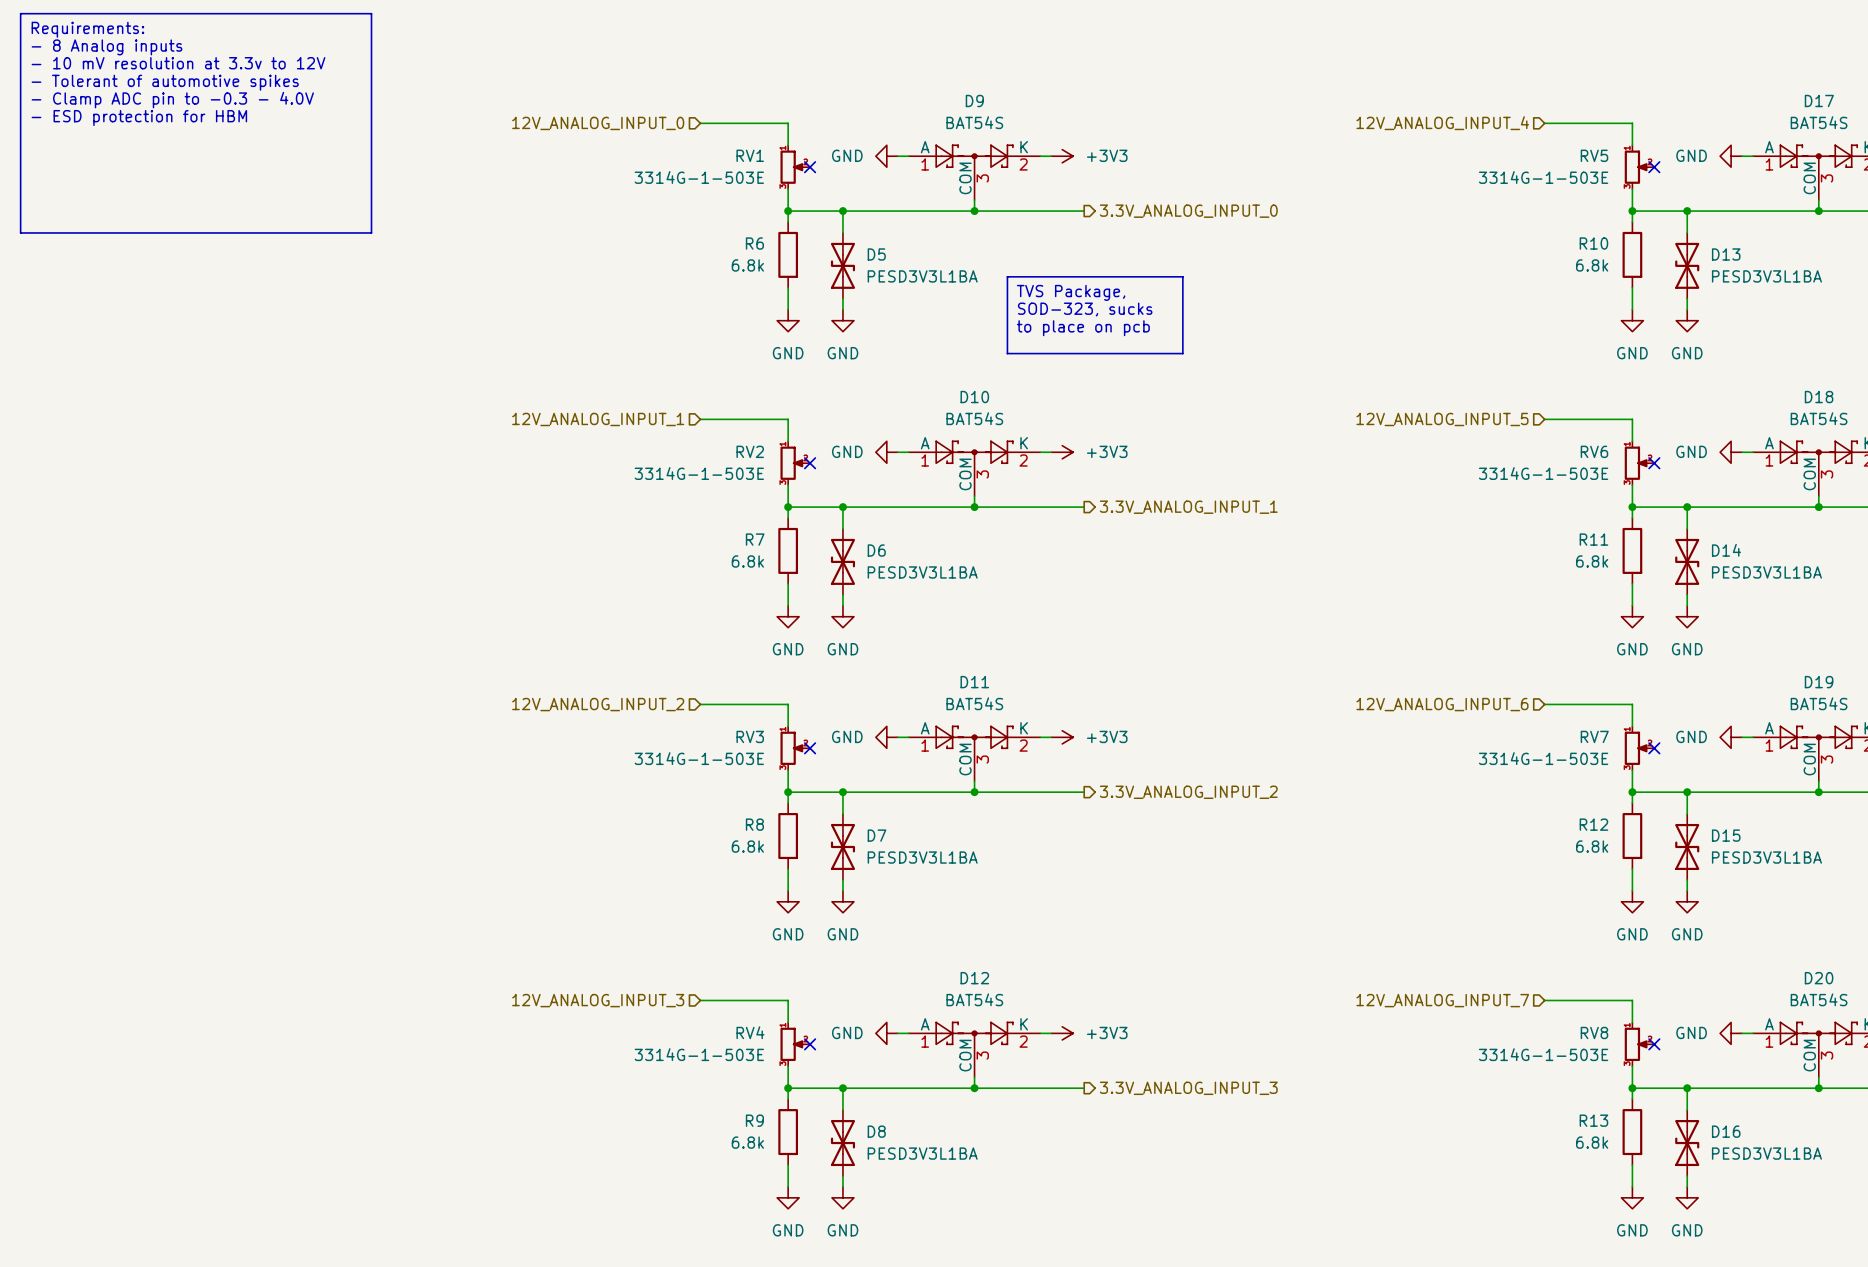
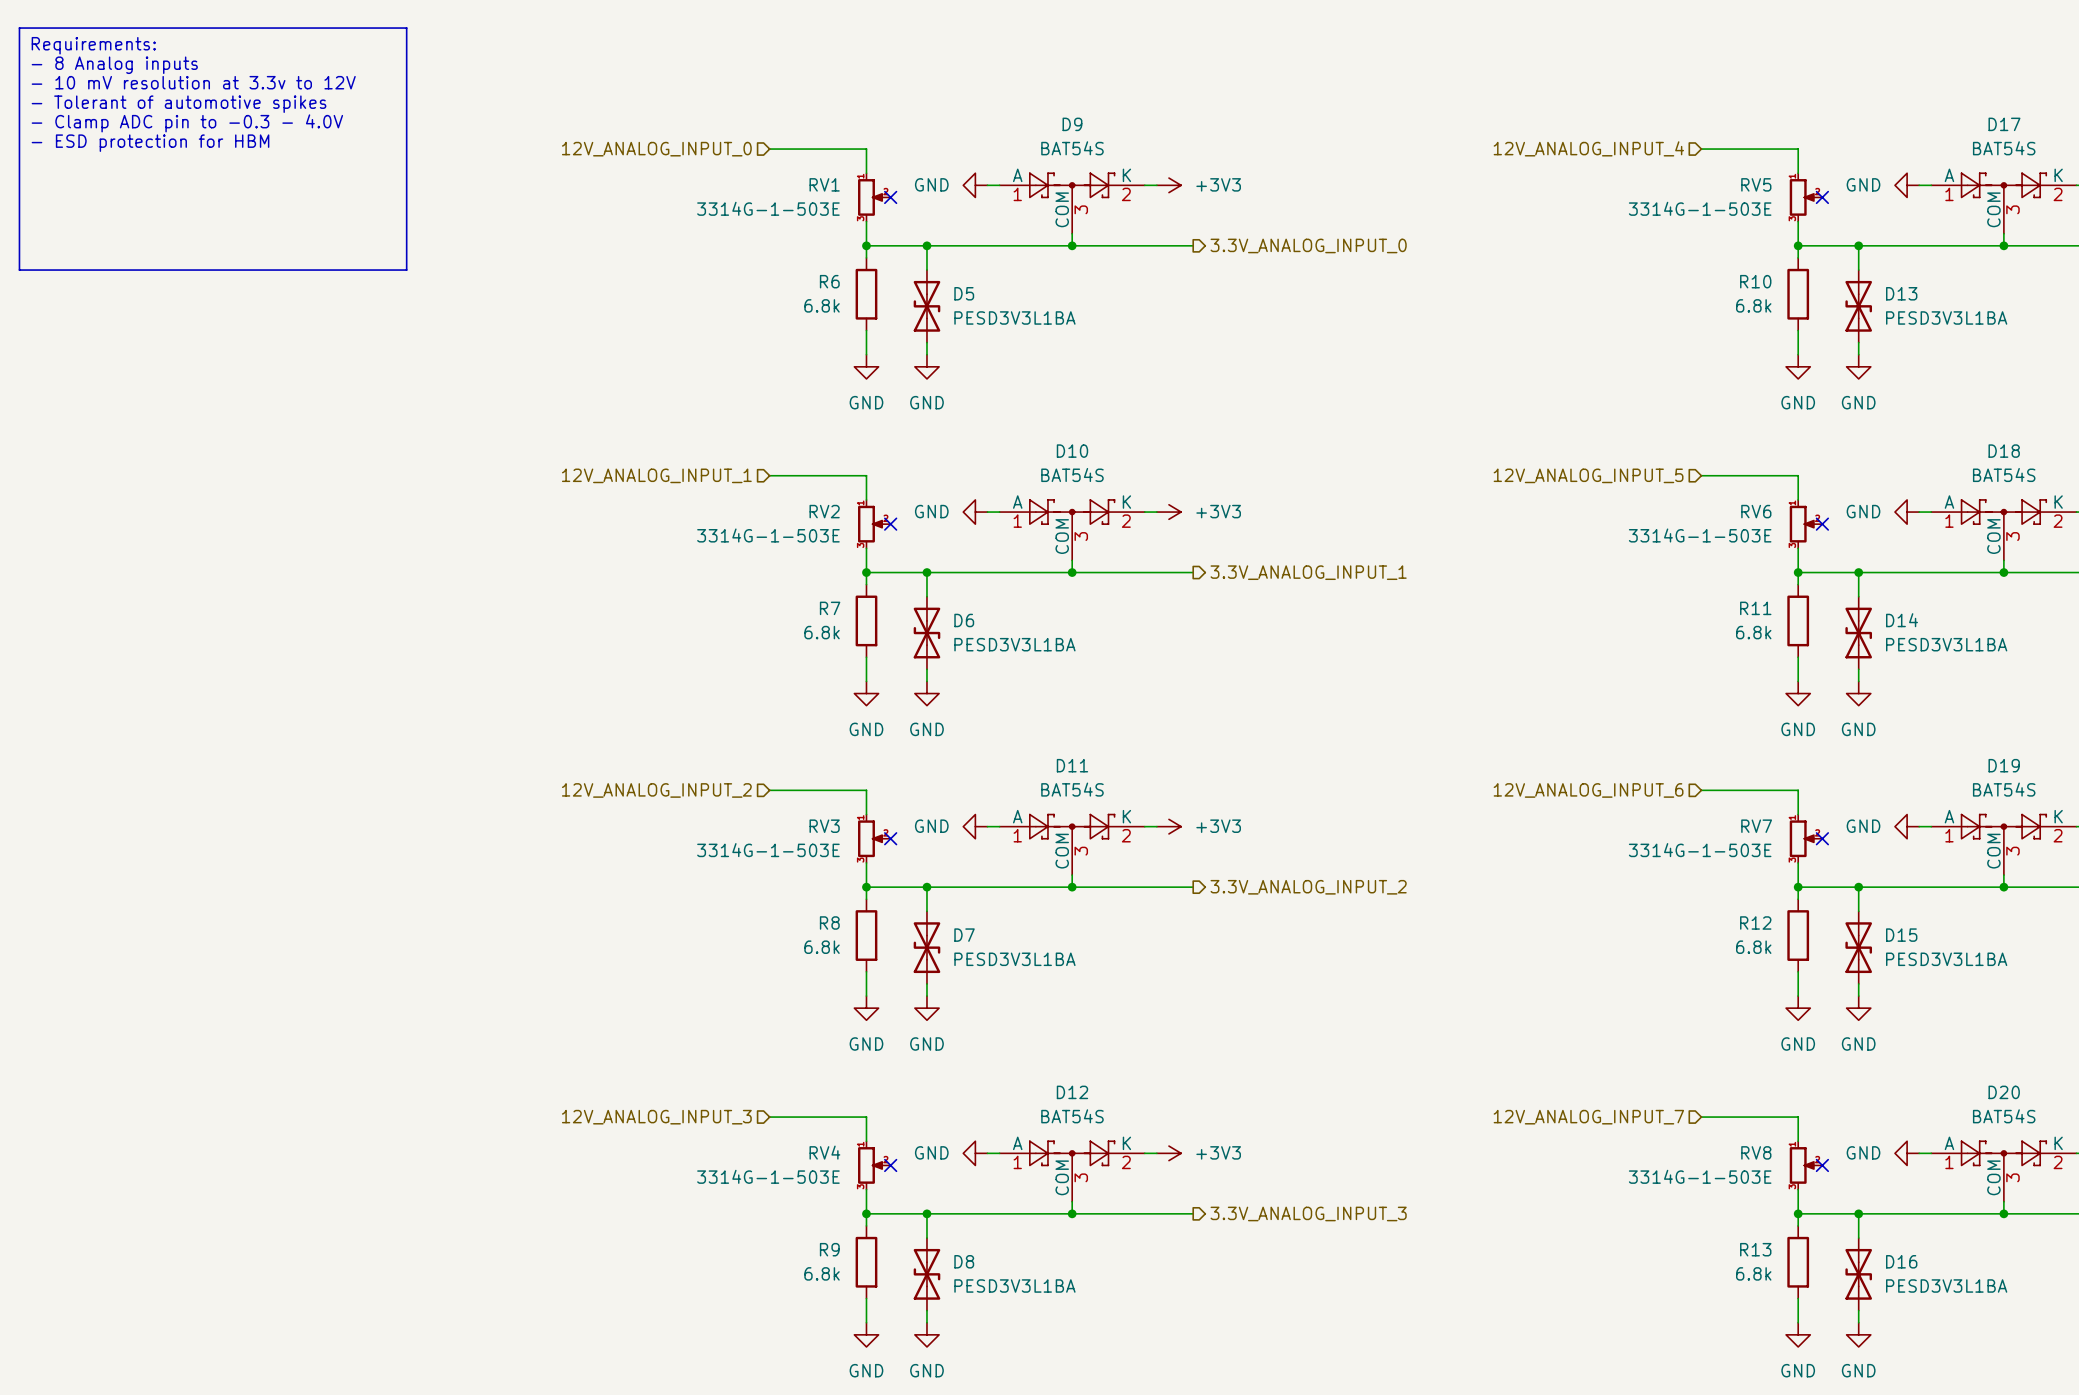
line: (1007, 276) (1182, 276) (1182, 353) (1007, 353) (1007, 276) -> none
text: TVS Package, (1071, 292) -> none
text: SOD-323, sucks (1085, 309) -> none
text: to place on pcb (1083, 328) -> none

